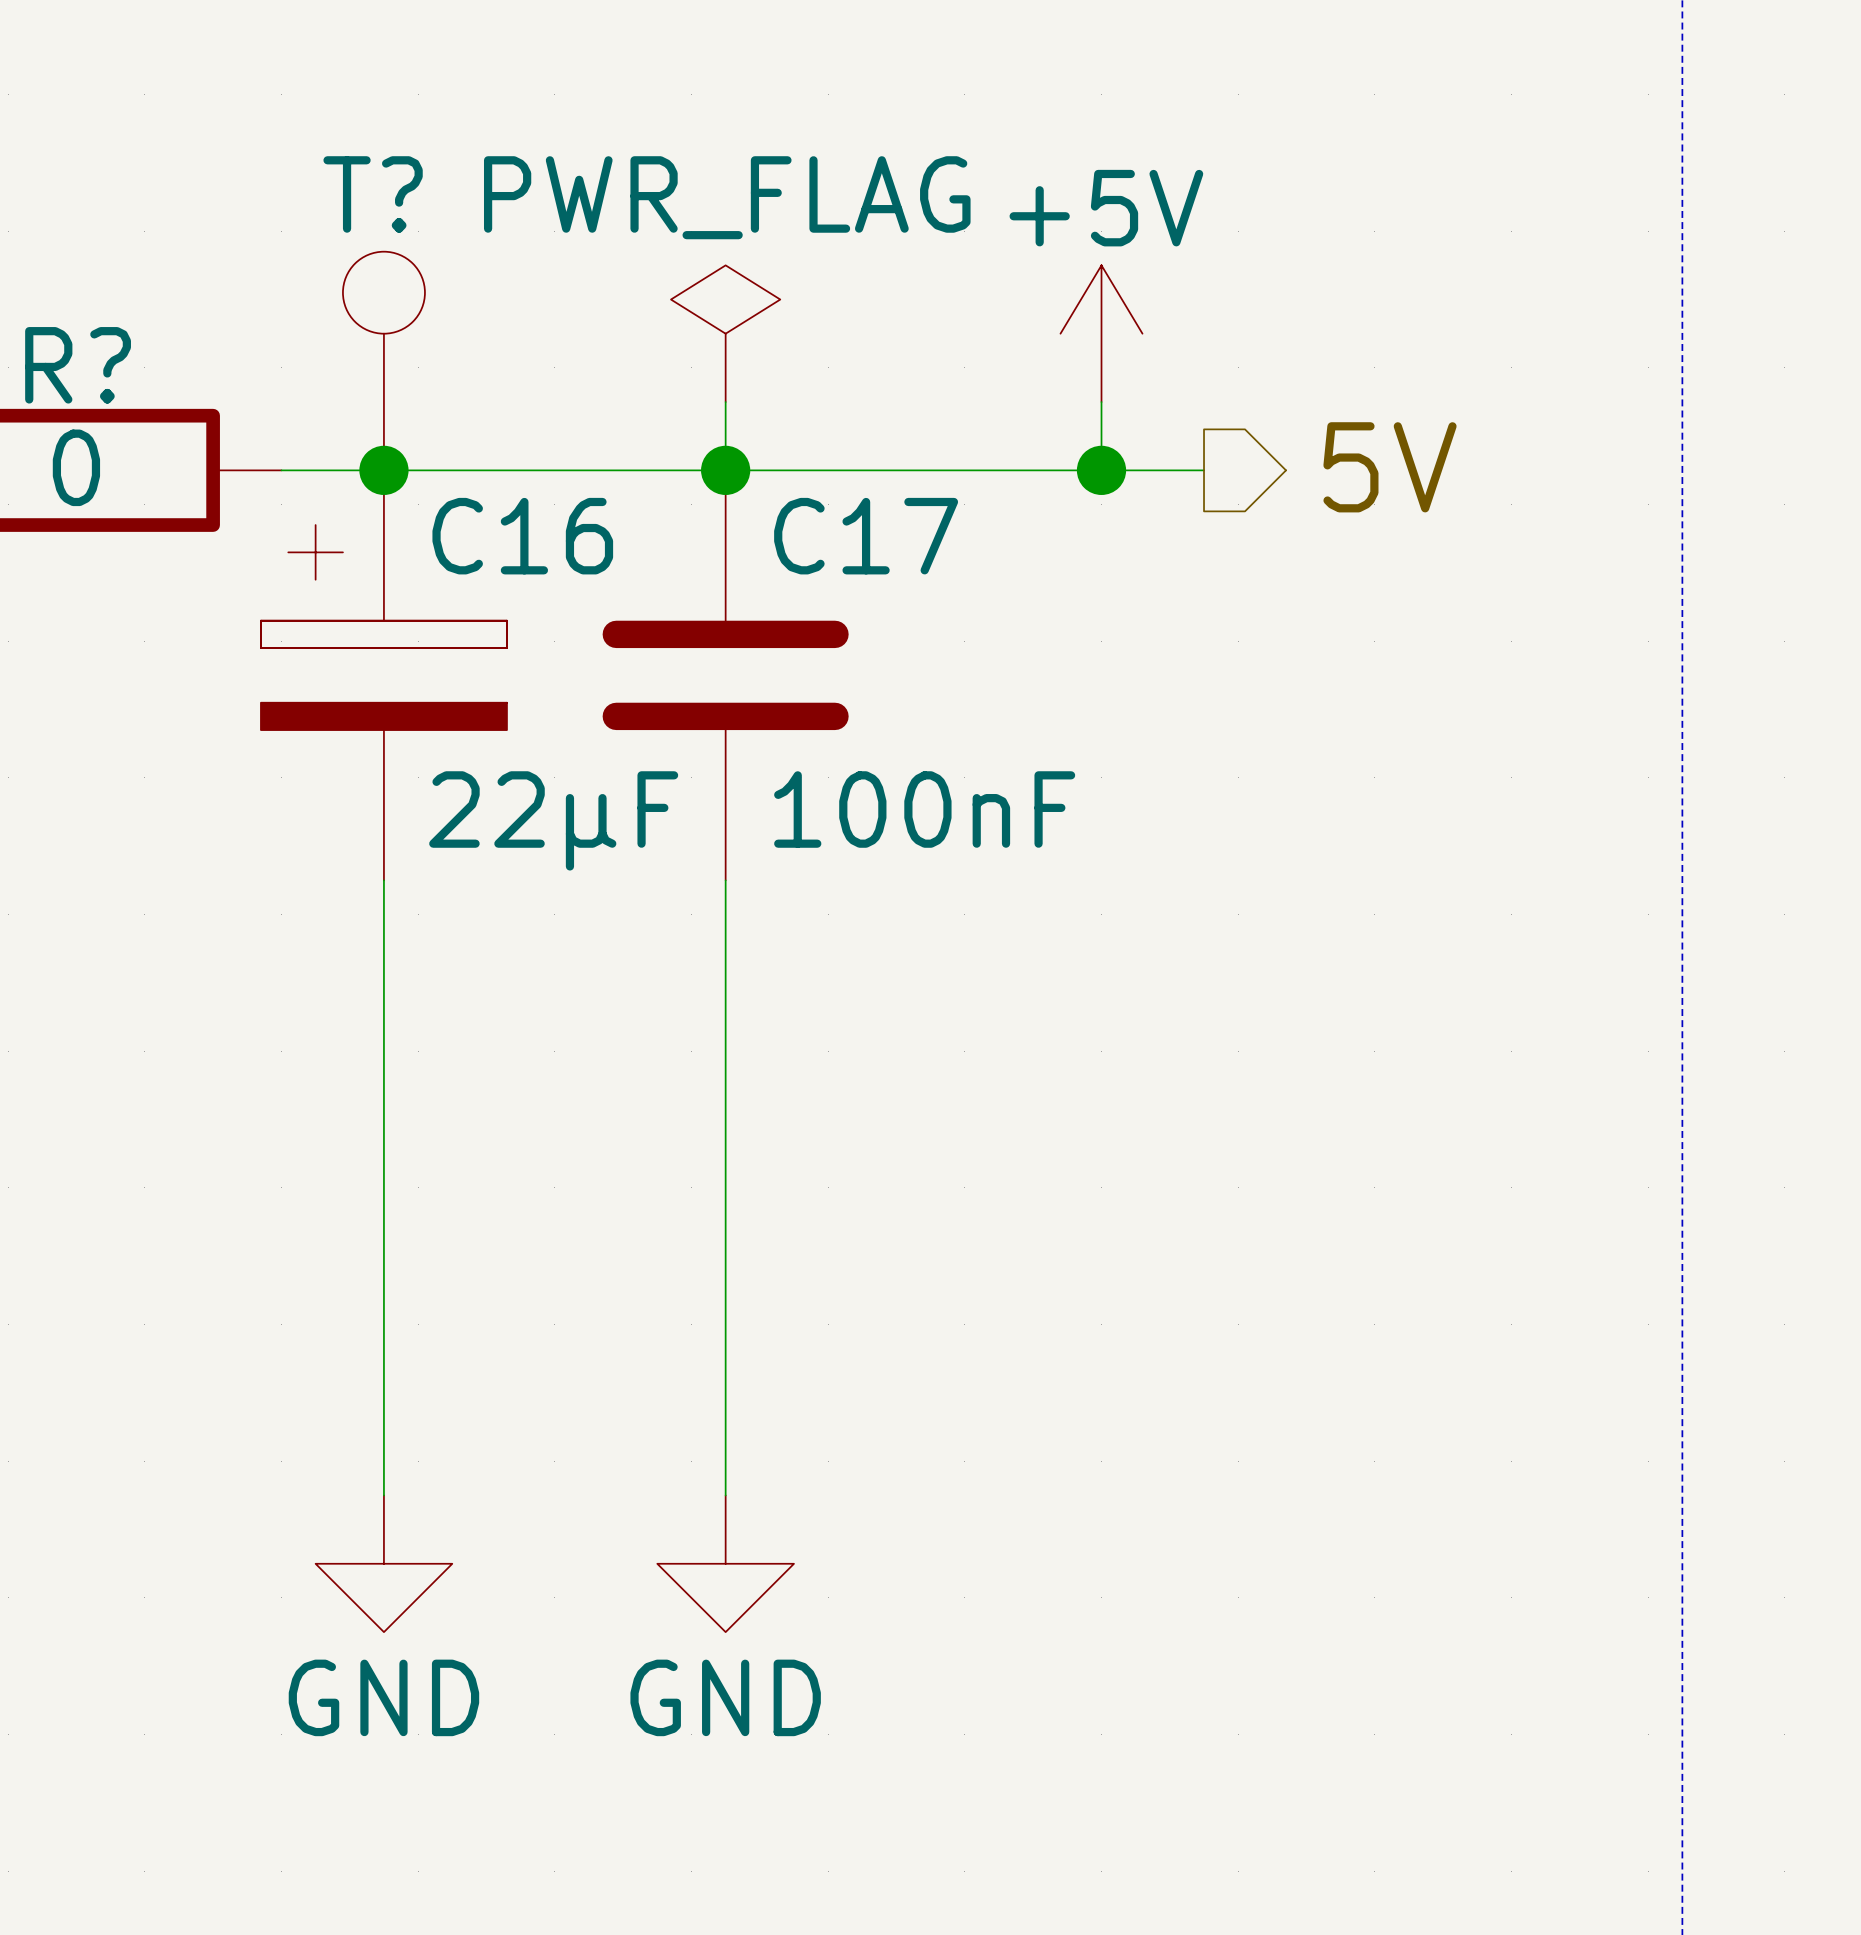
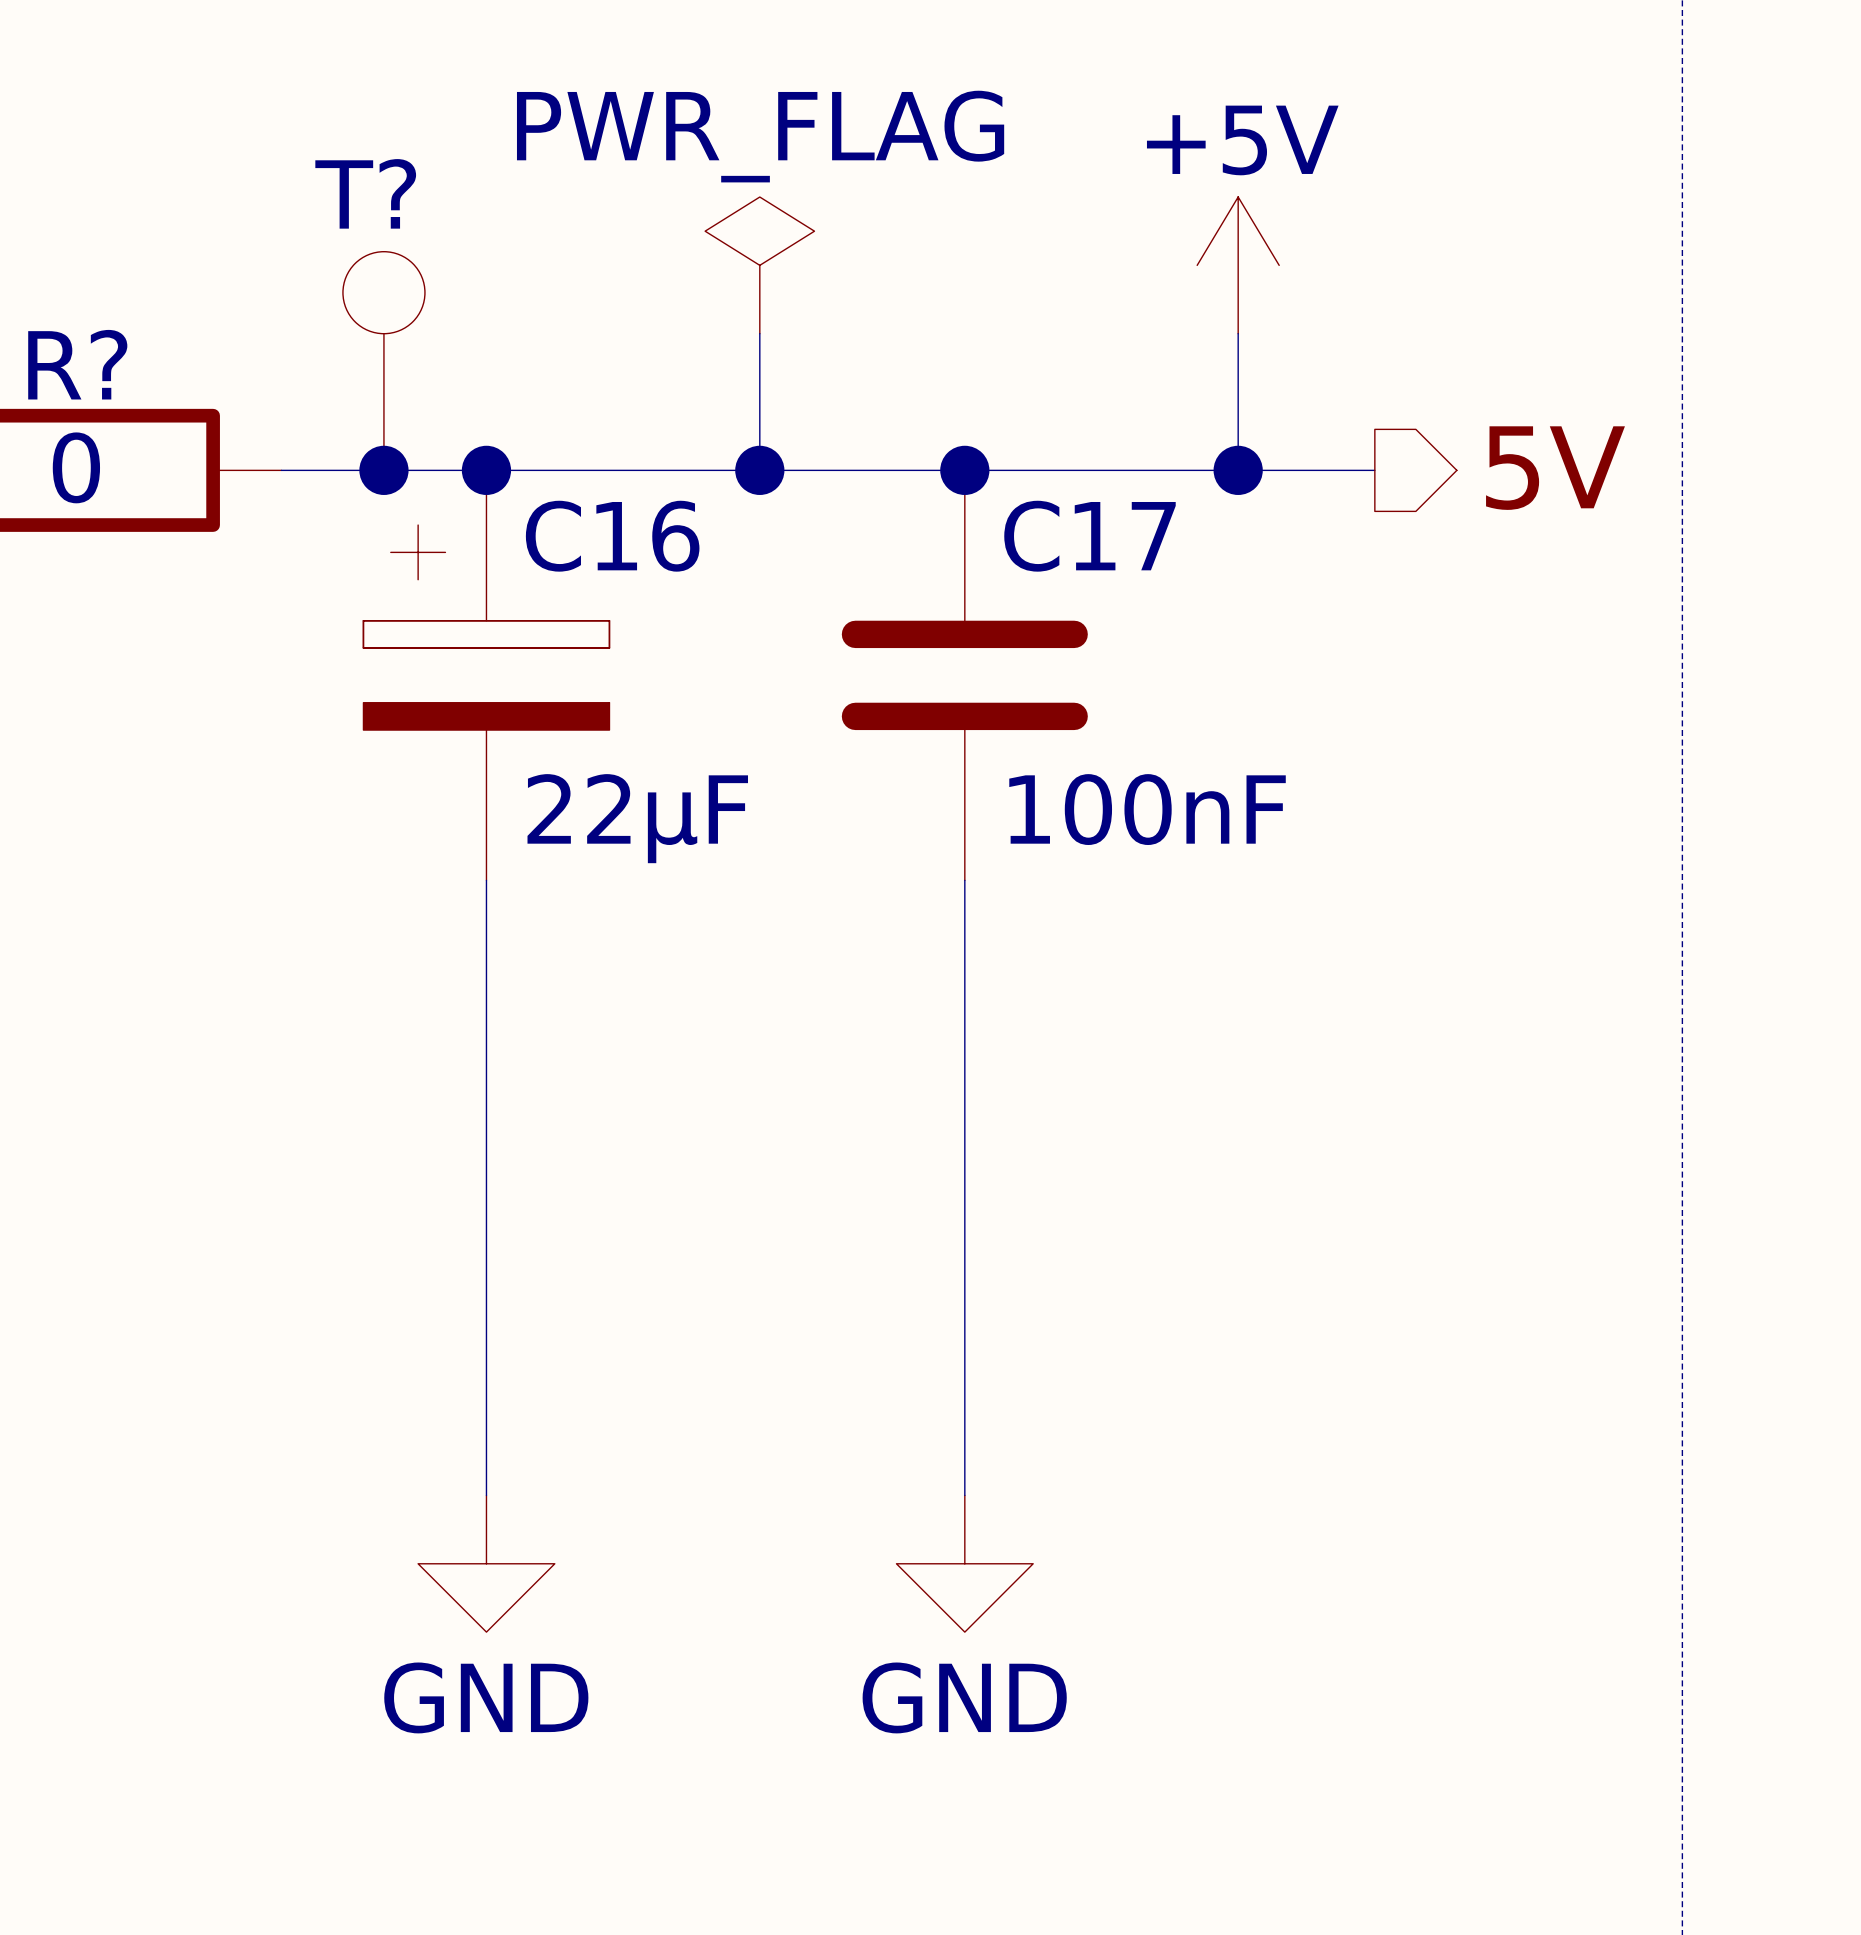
power symbol position: PWR_FLAG (725, 333) -> PWR_FLAG (759, 265)
wire: none -> (759, 333) (759, 470)
power symbol position: +5V (1101, 333) -> +5V (1238, 265)
wire: none -> (1238, 333) (1238, 470)
wire: (725, 402) (725, 470) -> none
wire: (1101, 402) (1101, 470) -> none
hierarchical label position: 5V (1390, 467) -> 5V (1555, 468)
junction: none -> (486, 470)
junction position: (725, 470) -> (759, 470)
junction: none -> (964, 470)
junction: (1101, 470) -> none
wire: none -> (1204, 470) (1374, 470)
junction: none -> (1238, 470)
C16 position: (383, 675) -> (486, 675)
C17 position: (725, 675) -> (964, 675)
wire: (383, 880) (383, 1495) -> (486, 880) (486, 1495)
wire: (725, 880) (725, 1495) -> (964, 880) (964, 1495)
power symbol position: GND (383, 1563) -> GND (486, 1563)
power symbol: GND (725, 1563) -> none
power symbol: none -> GND (964, 1563)

